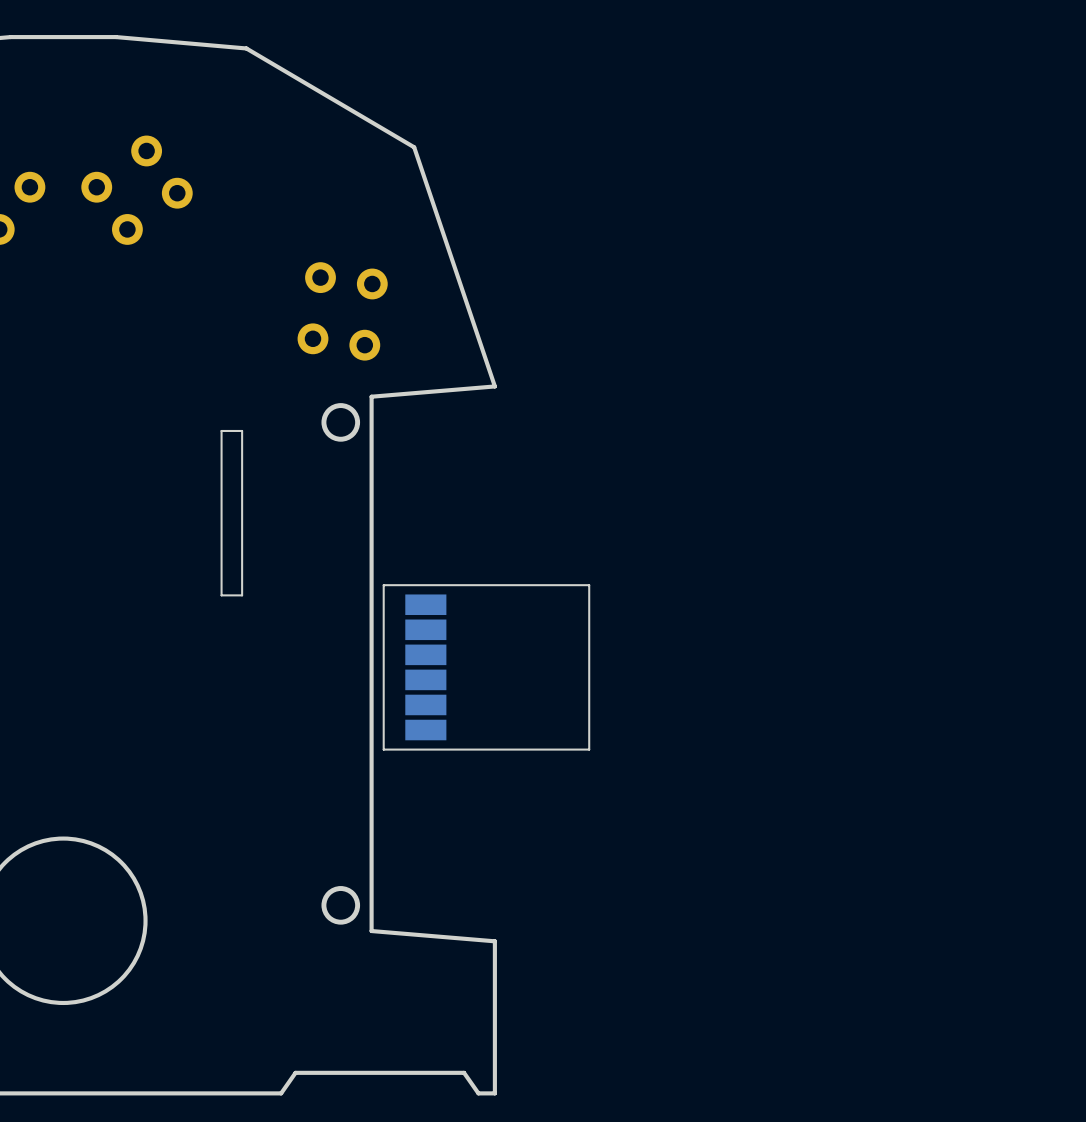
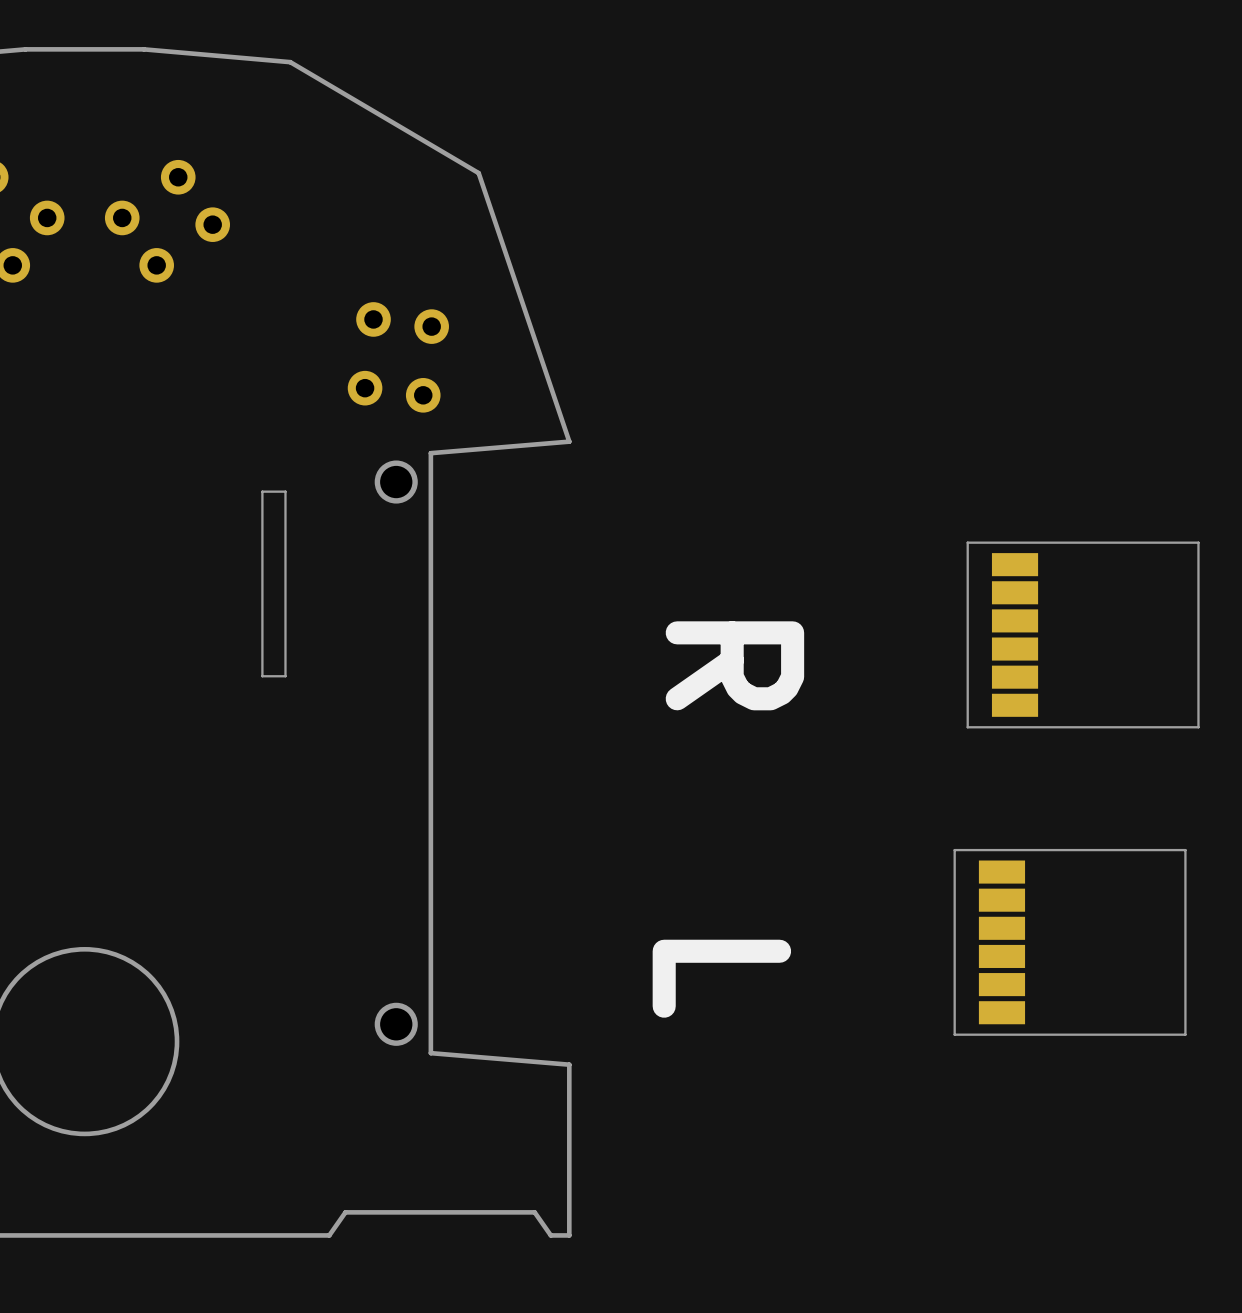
part: none -> (1015, 634)
board edge: (589, 585) (383, 585) (383, 749) (589, 749) (589, 585) -> (1198, 542) (967, 542) (967, 727) (1198, 727) (1198, 542)
text: none -> R (734, 665)
part: (425, 667) -> none
board edge: none -> (1185, 850) (954, 850) (954, 1034) (1185, 1034) (1185, 850)
part: none -> (1001, 942)
text: none -> L (721, 978)

